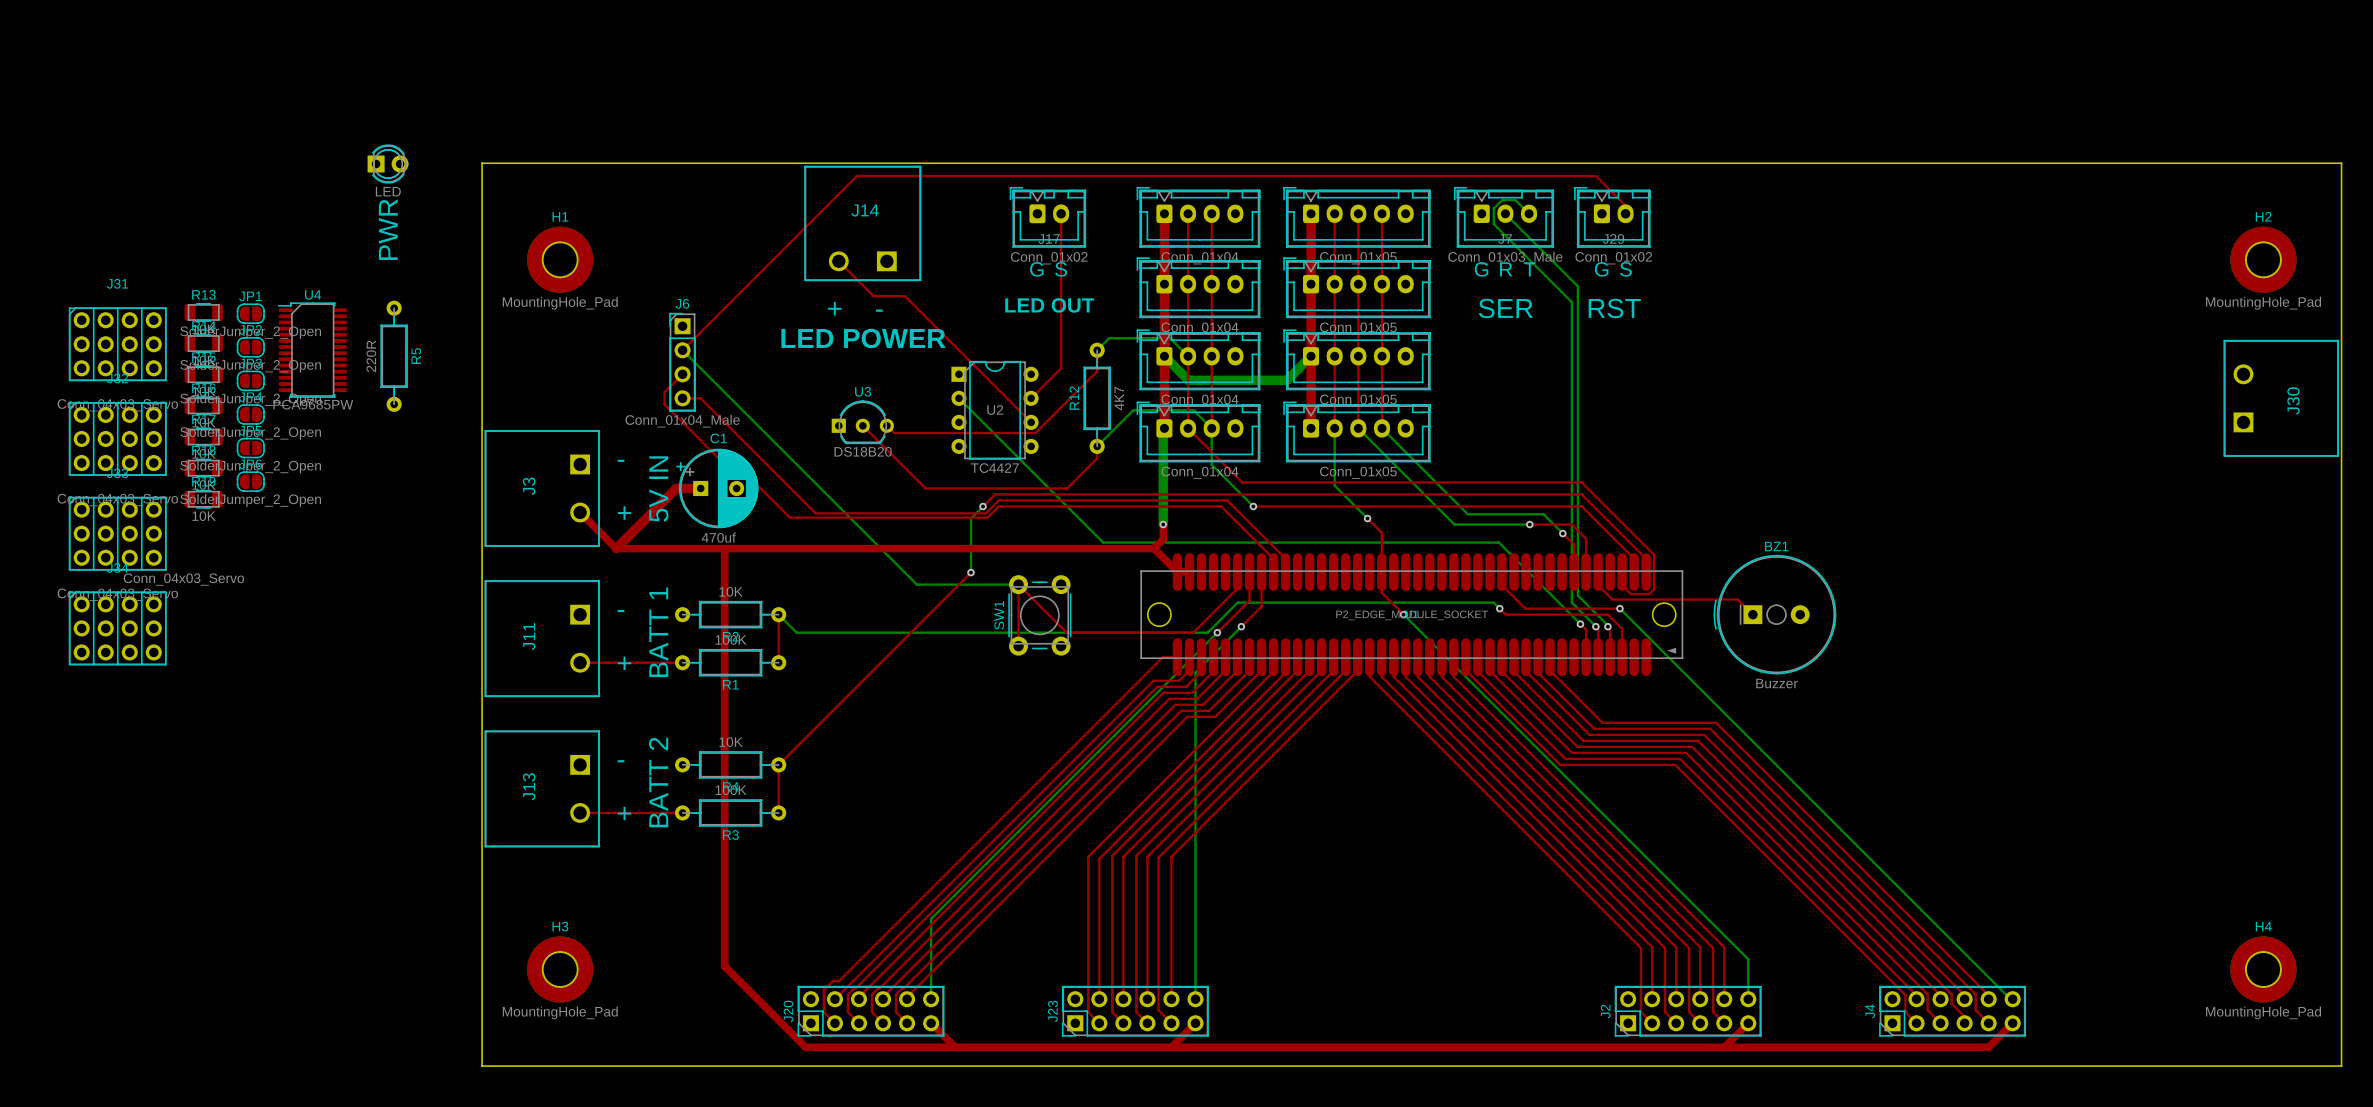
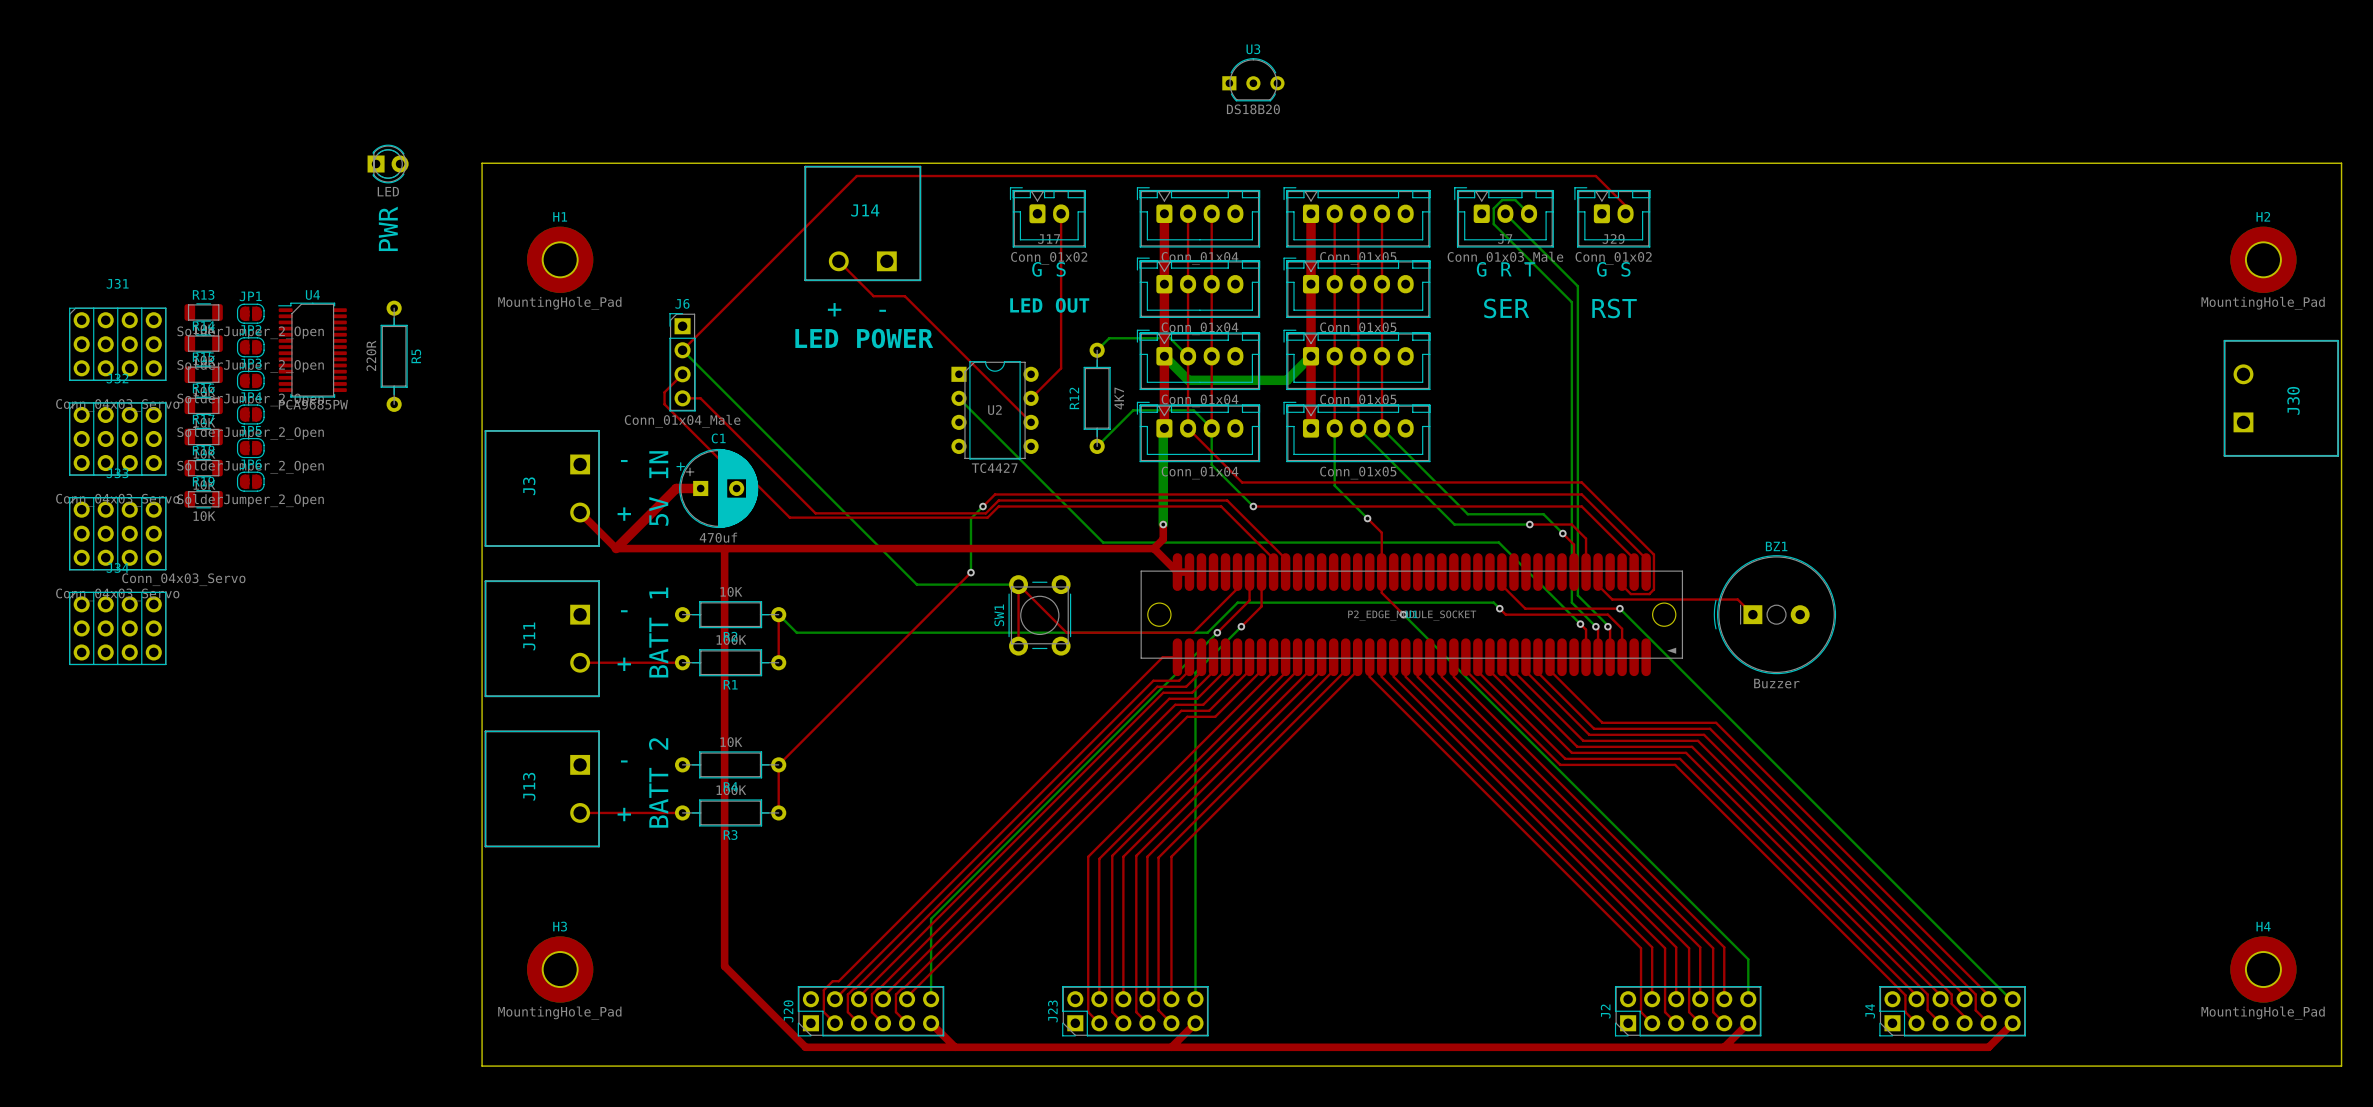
top track: (1097, 350) (1097, 371) (1035, 433) (894, 433) (886, 425) -> none
U3 position: (862, 422) -> (1253, 79)
top track: (862, 425) (925, 488) (1067, 488) (1097, 458) (1097, 446) -> none

